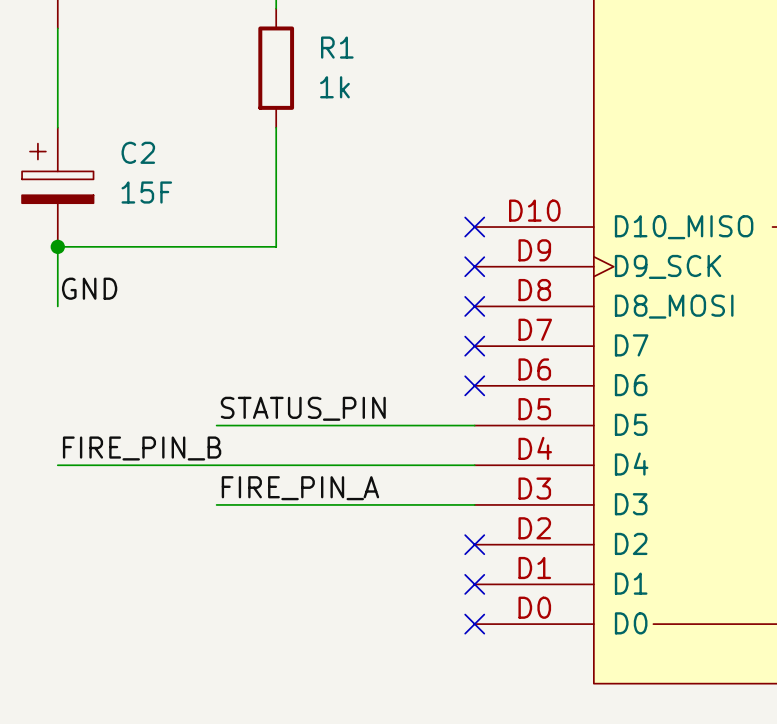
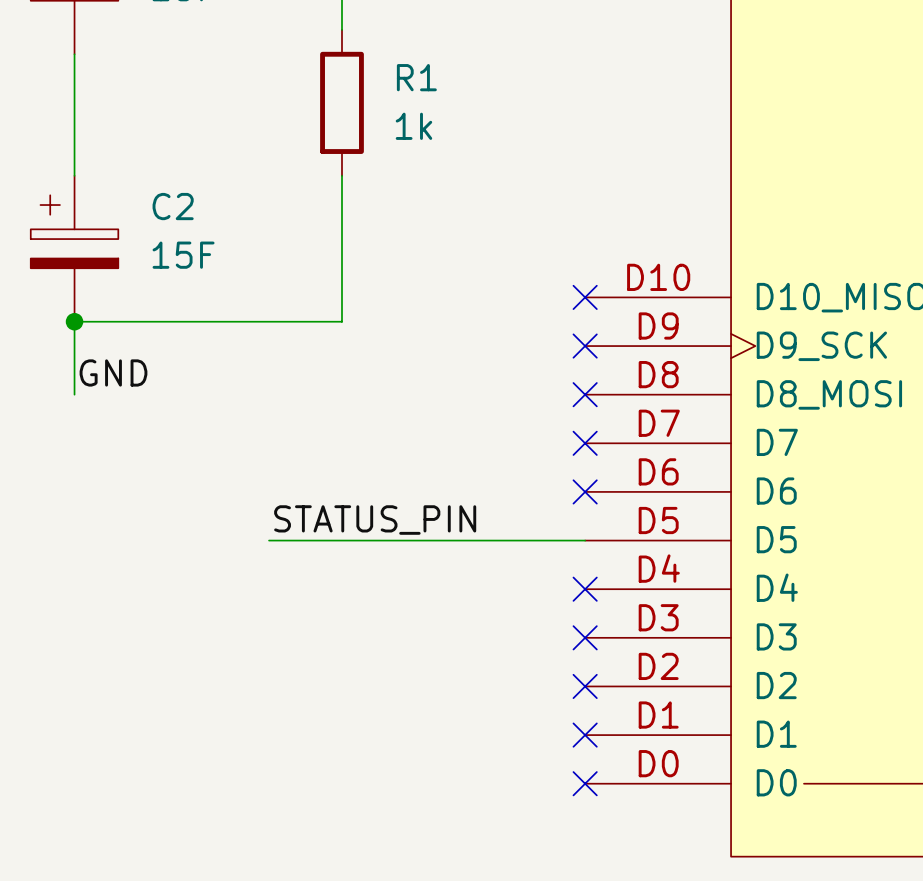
label: FIRE_PIN_B (142, 448) -> none
wire: (57, 465) (474, 465) -> none
no-connect mark: none -> (585, 589)
label: FIRE_PIN_A (300, 488) -> none
wire: (216, 504) (474, 504) -> none
no-connect mark: none -> (585, 637)

